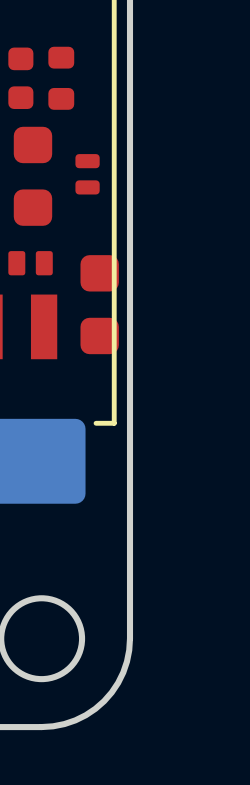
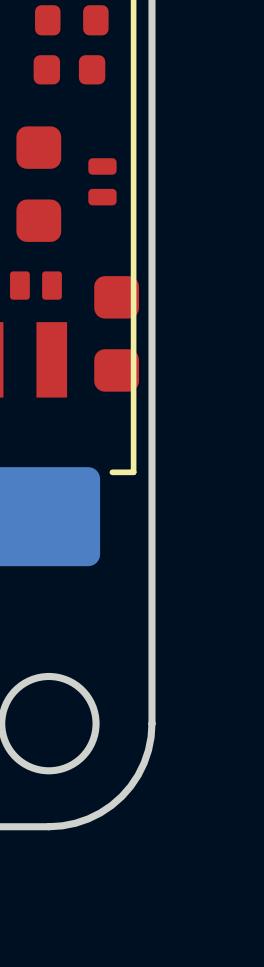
part: none -> (71, 20)
part footprint: [48, 46, 75, 110] -> [33, 55, 106, 85]
part: (20, 78) -> none

